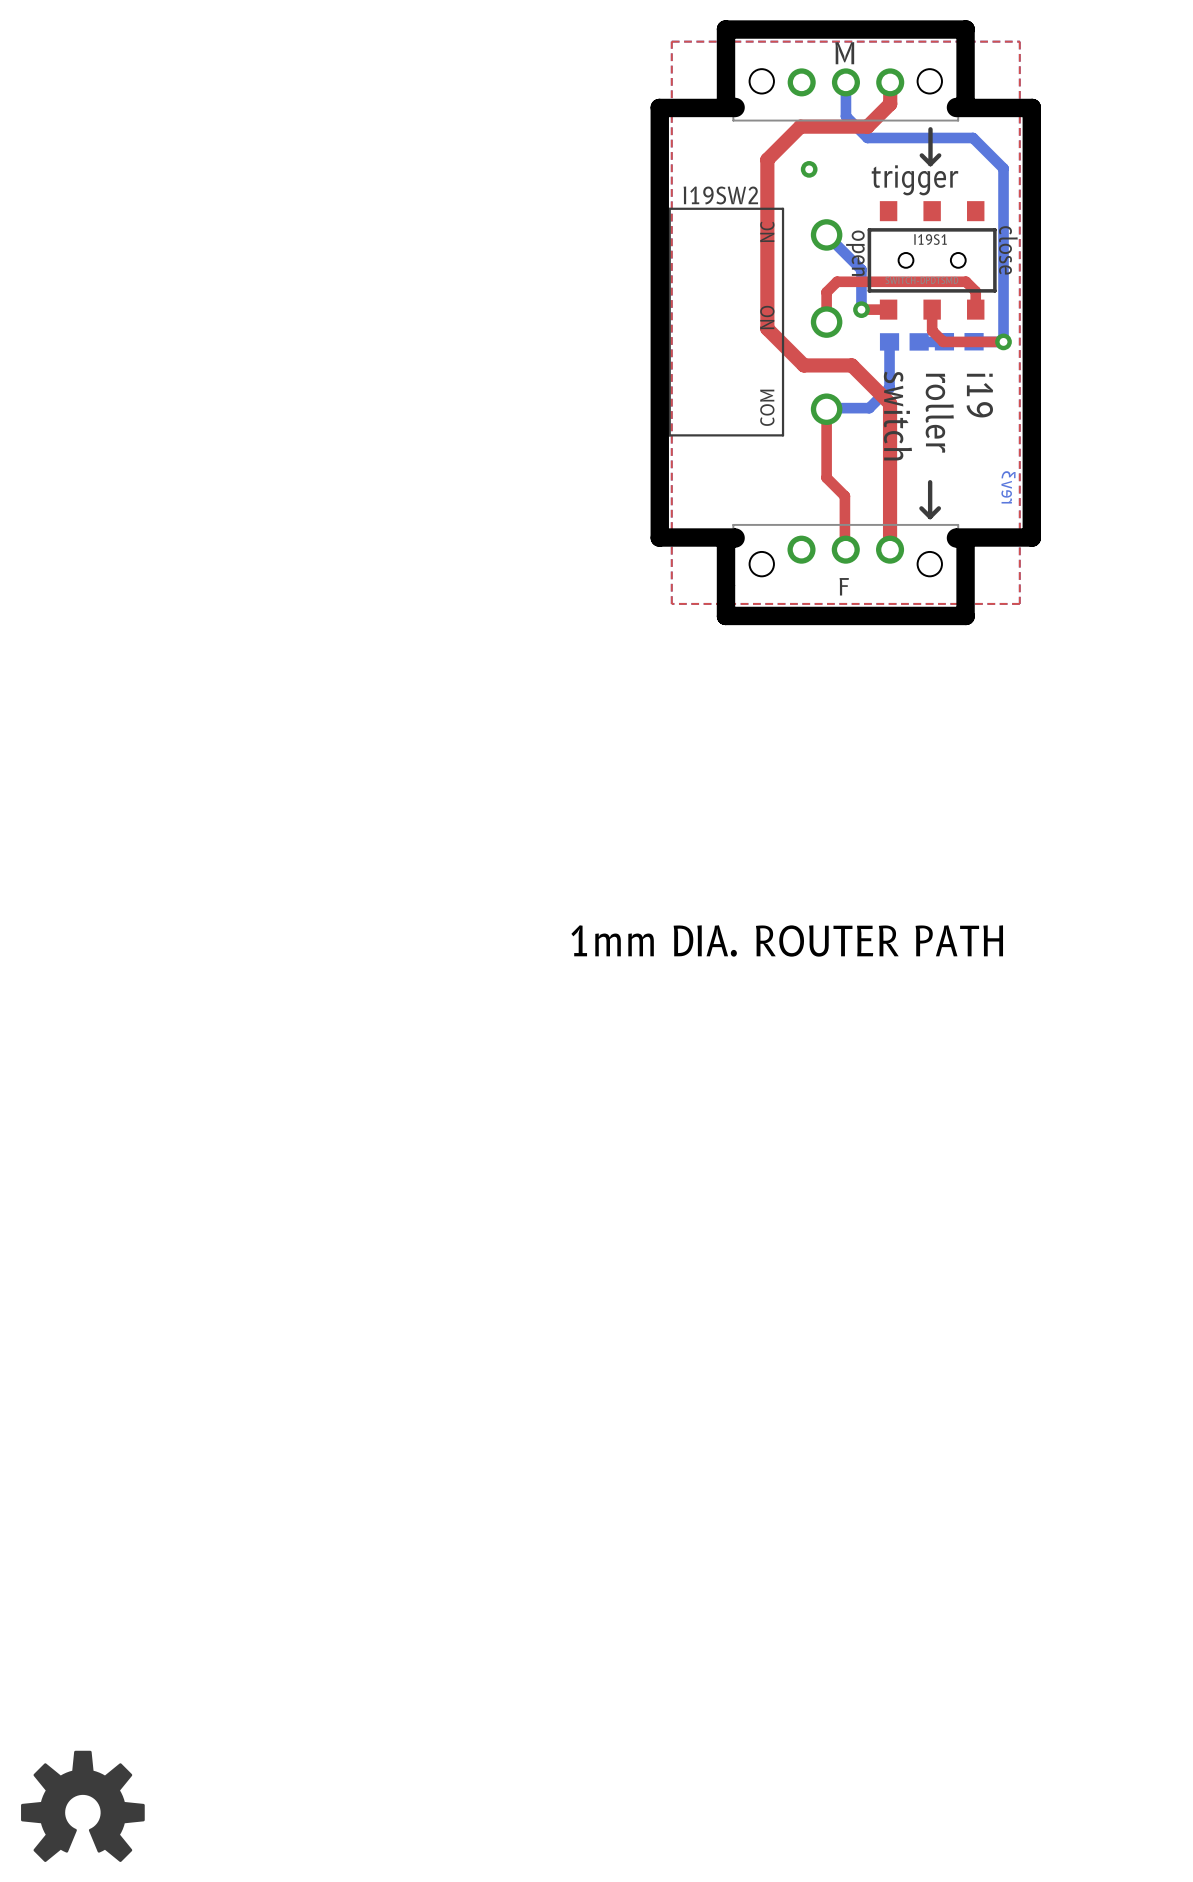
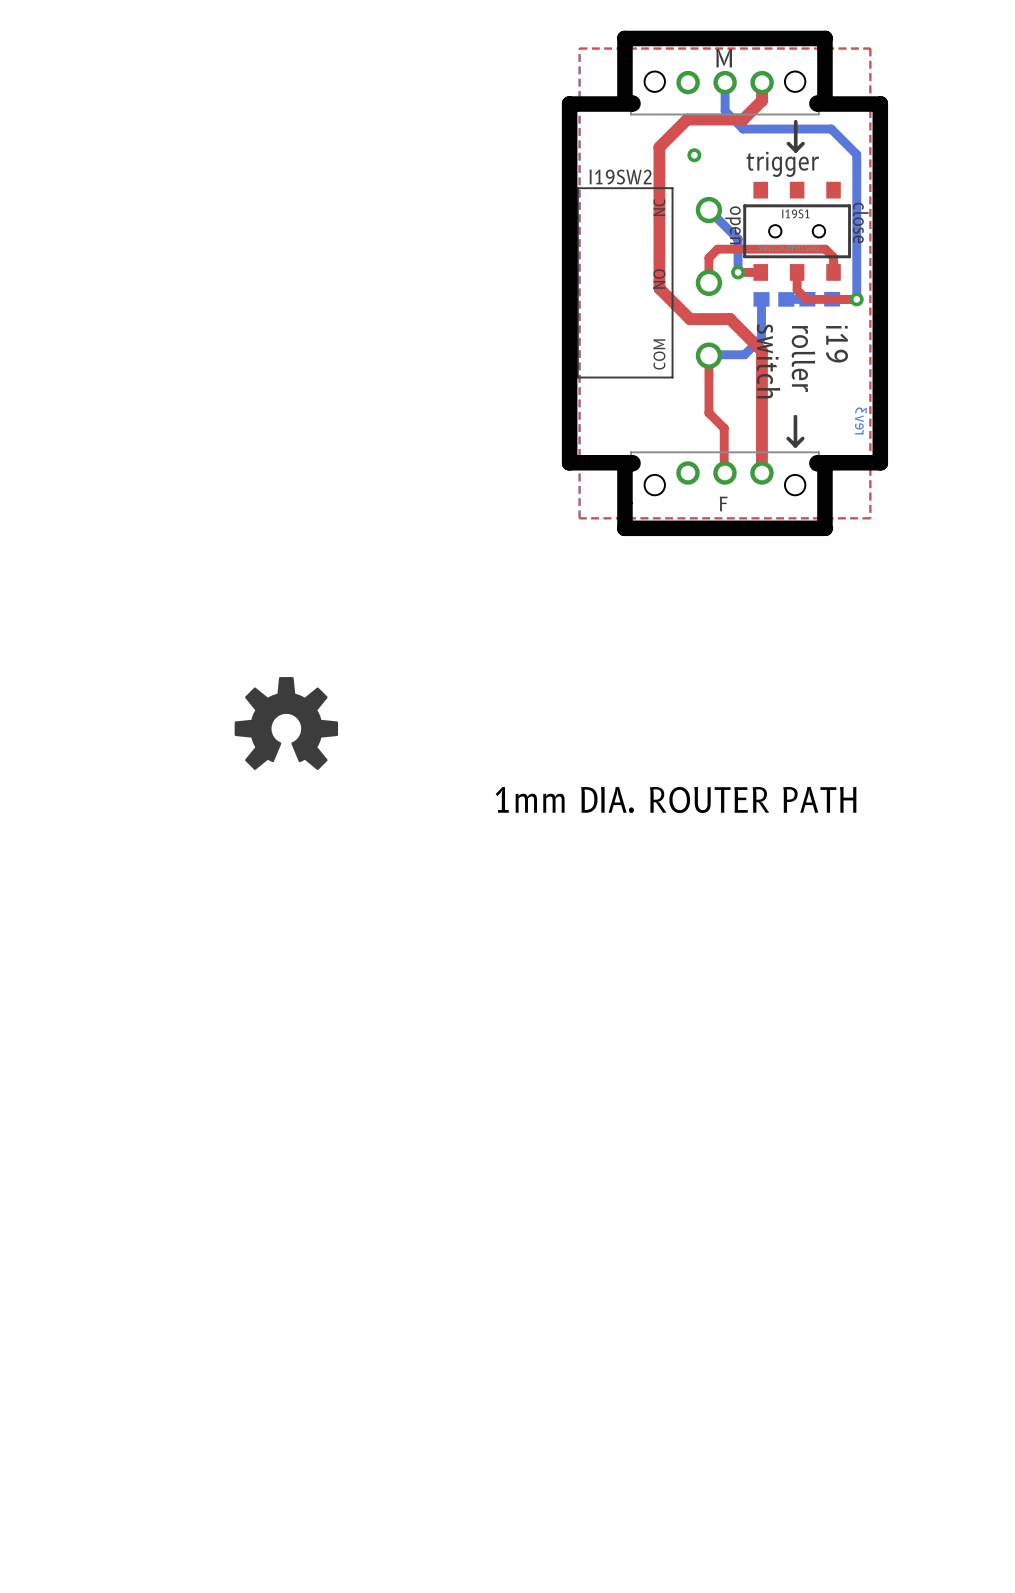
drawing: none -> [234, 677, 339, 770]
drawing: [21, 1750, 145, 1863] -> none

